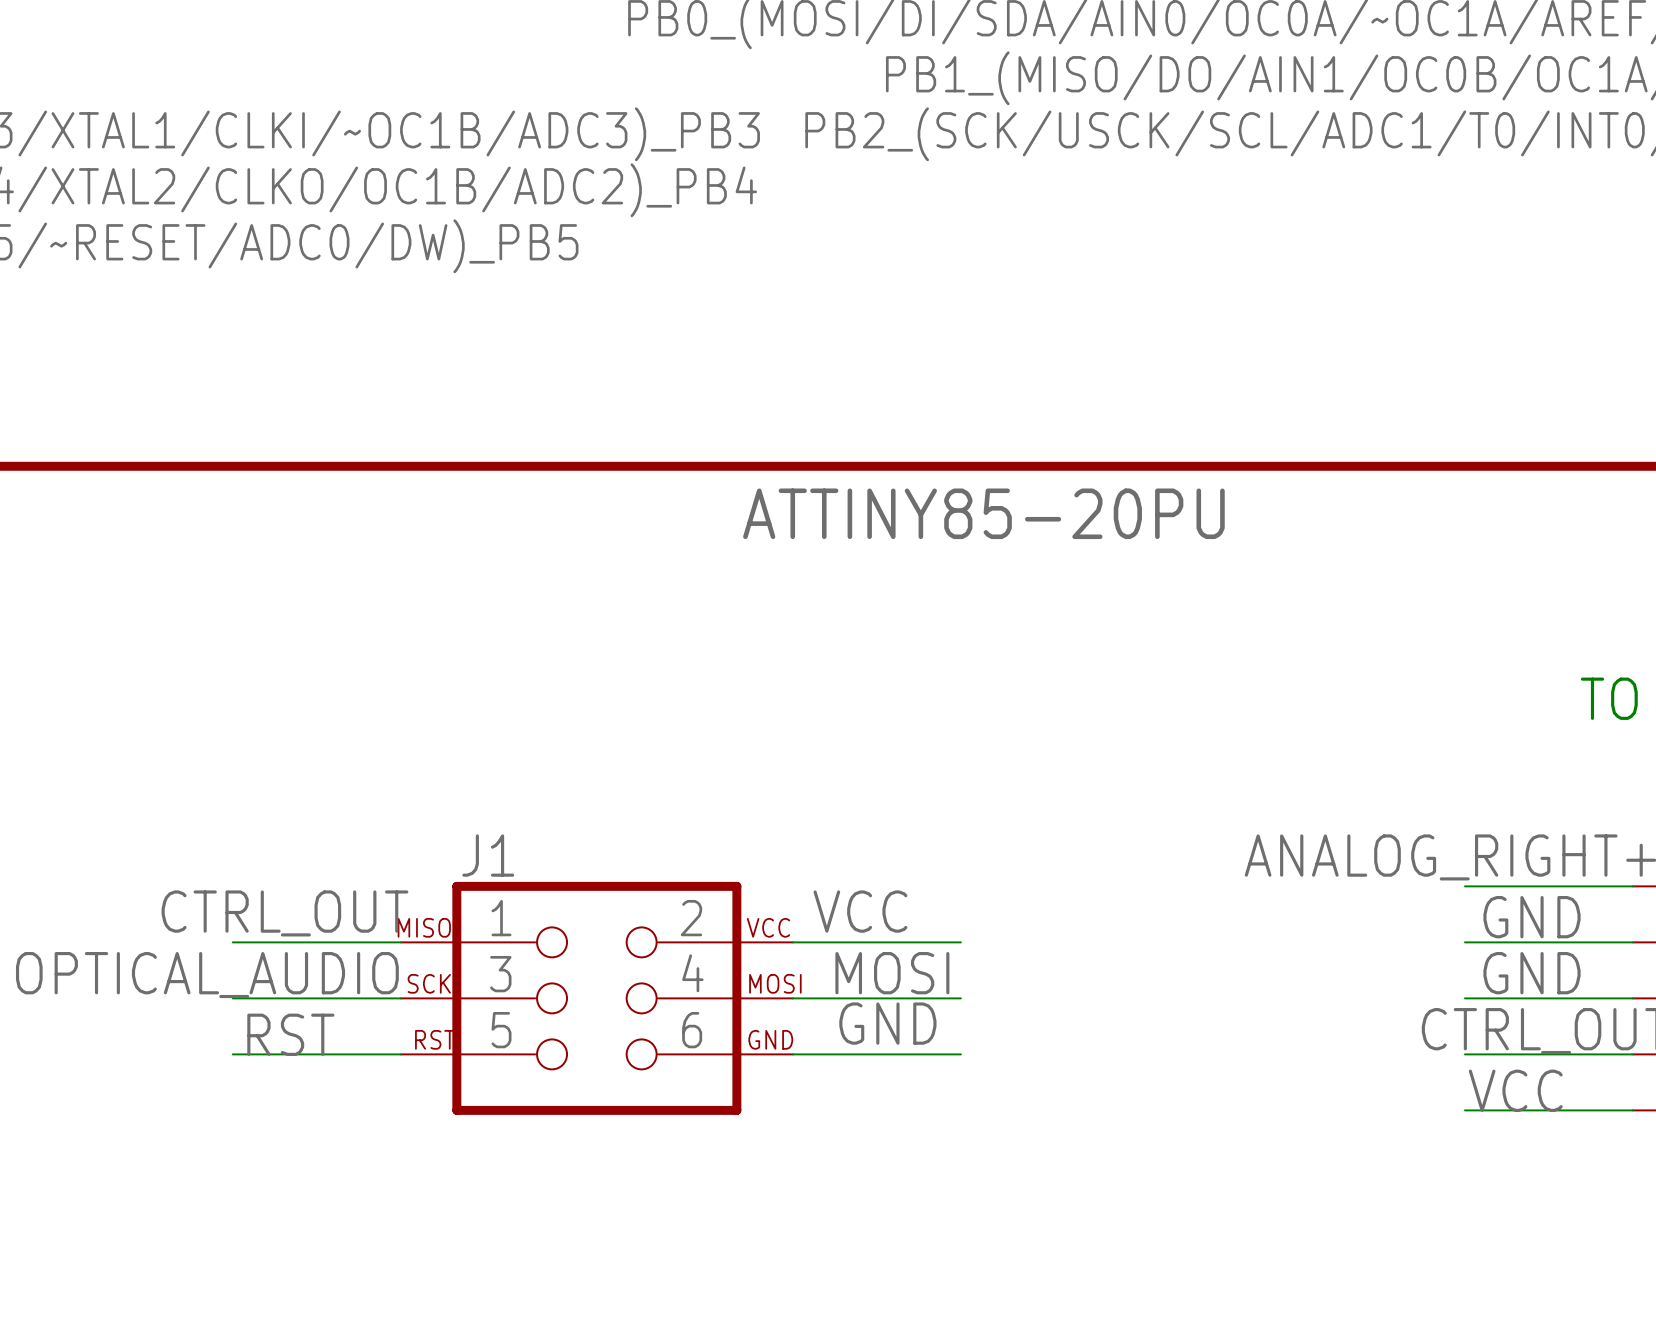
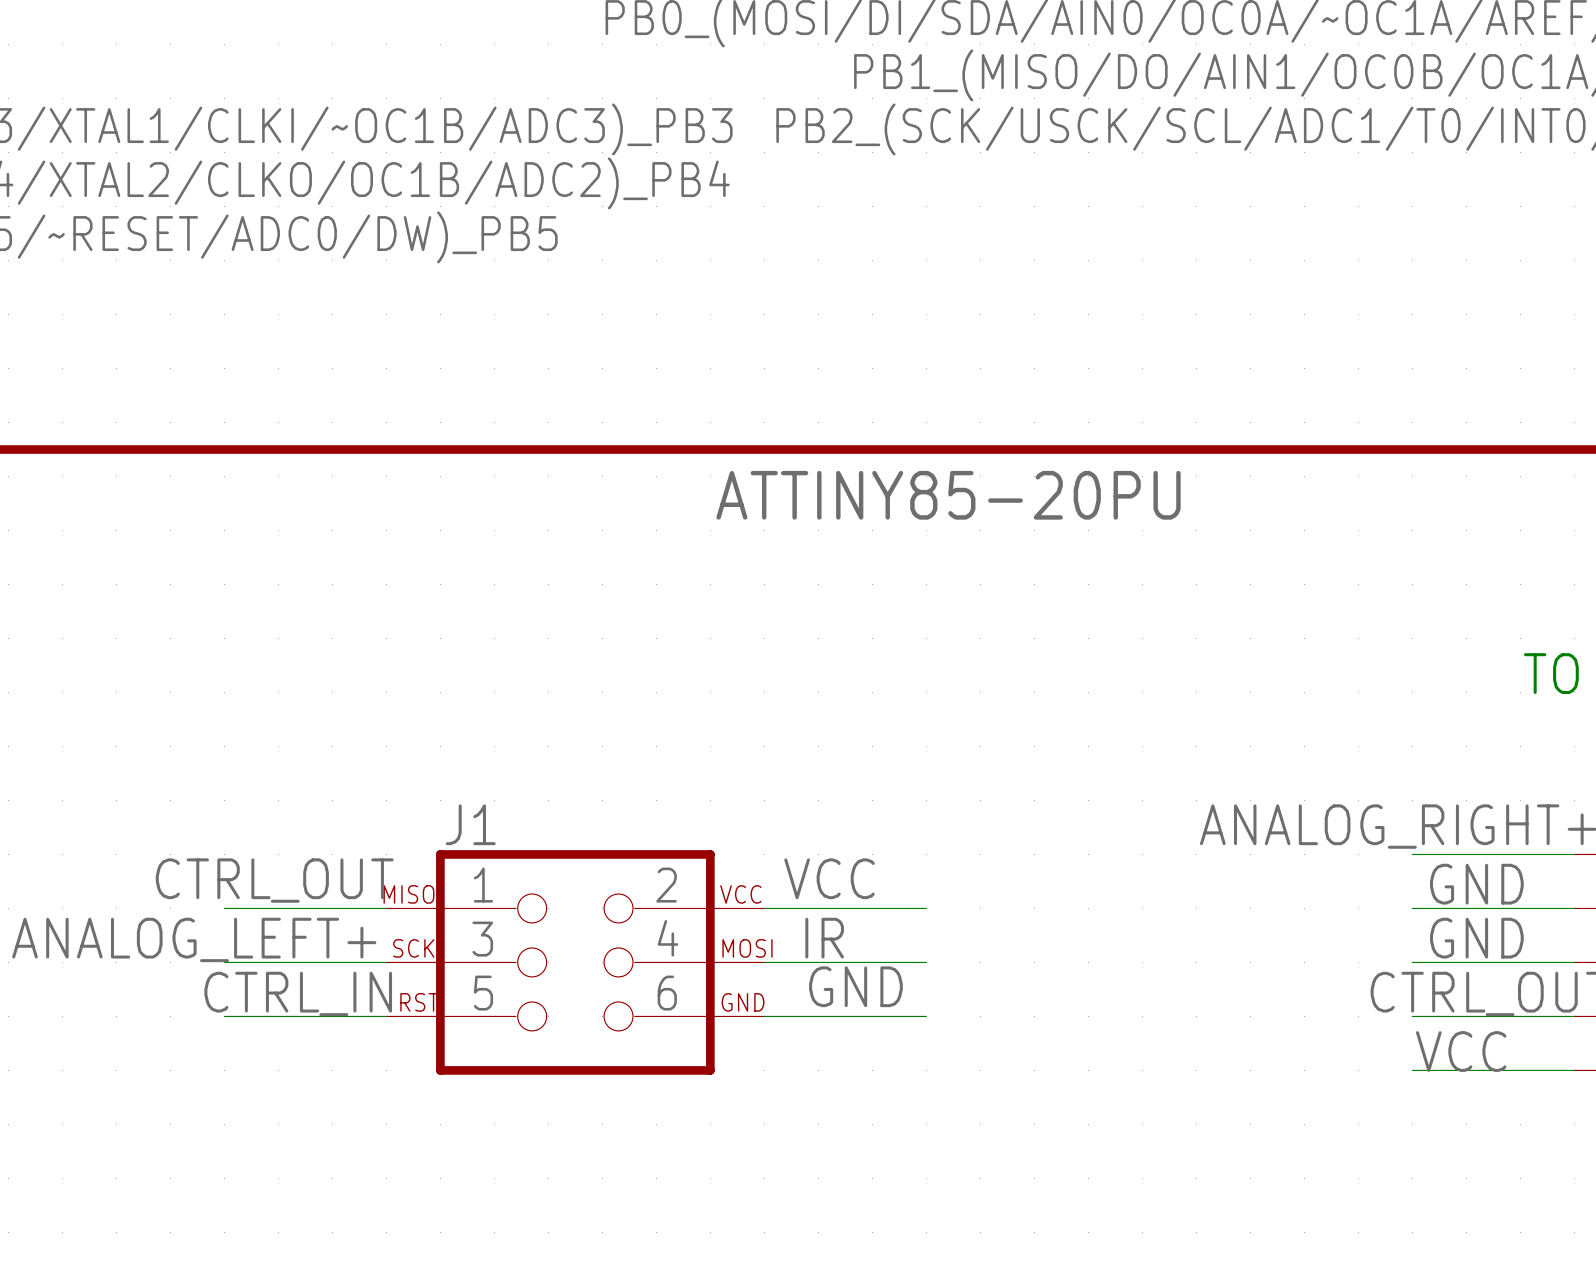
label: MOSI (892, 973) -> IR (824, 938)
label: OPTICAL_AUDIO (207, 975) -> ANALOG_LEFT+ (194, 939)
label: none -> CTRL_IN (298, 993)
label: RST (290, 1034) -> none

